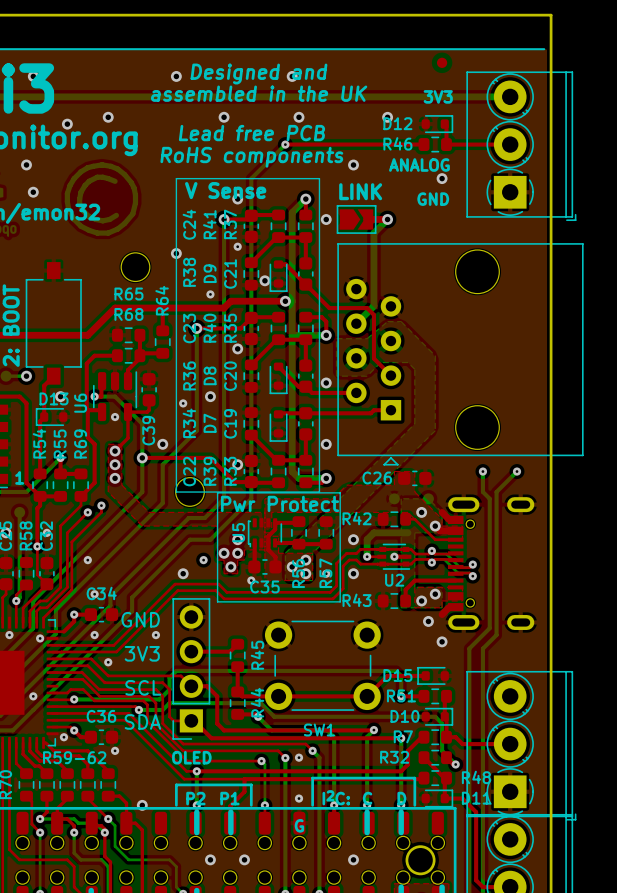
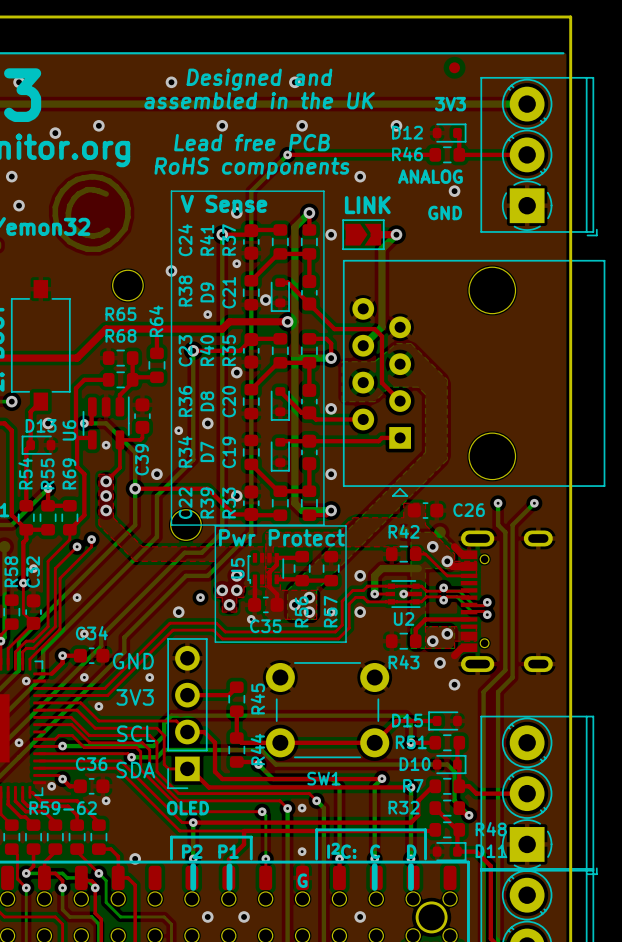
C26 name position: C26 (377, 477) -> C26 (469, 510)
R42 name position: R42 (357, 518) -> R42 (404, 531)
R43 name position: R43 (357, 600) -> R43 (404, 662)

